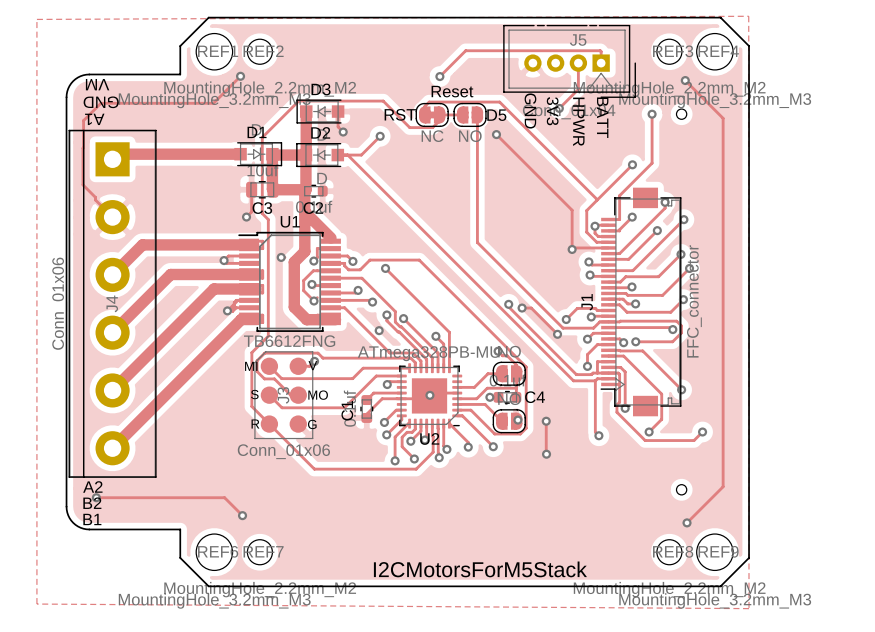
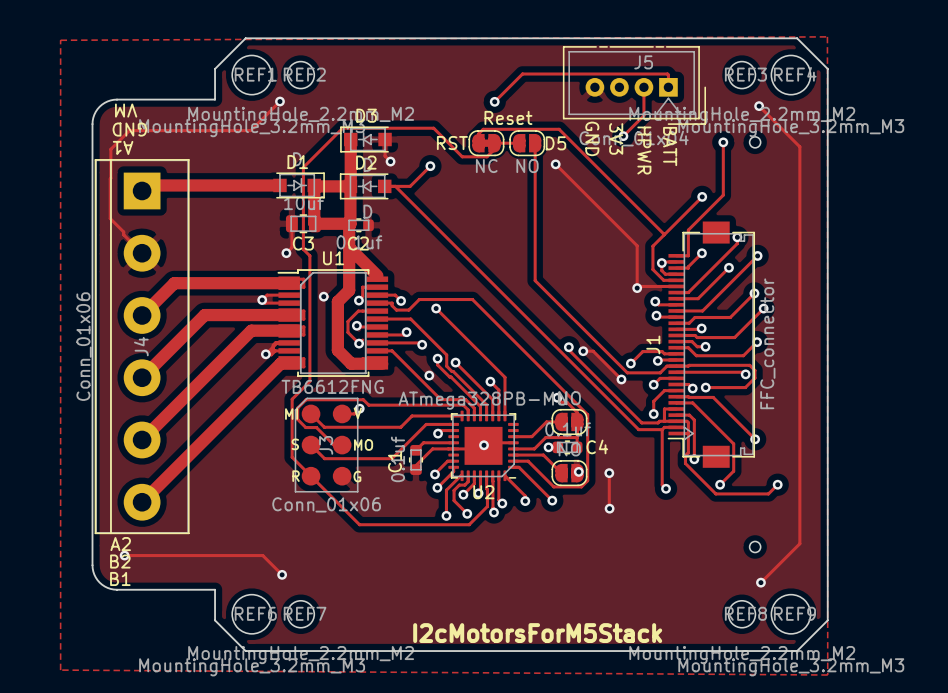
text: I2CMotorsForM5Stack (480, 569) -> I2cMotorsForM5Stack (537, 633)

